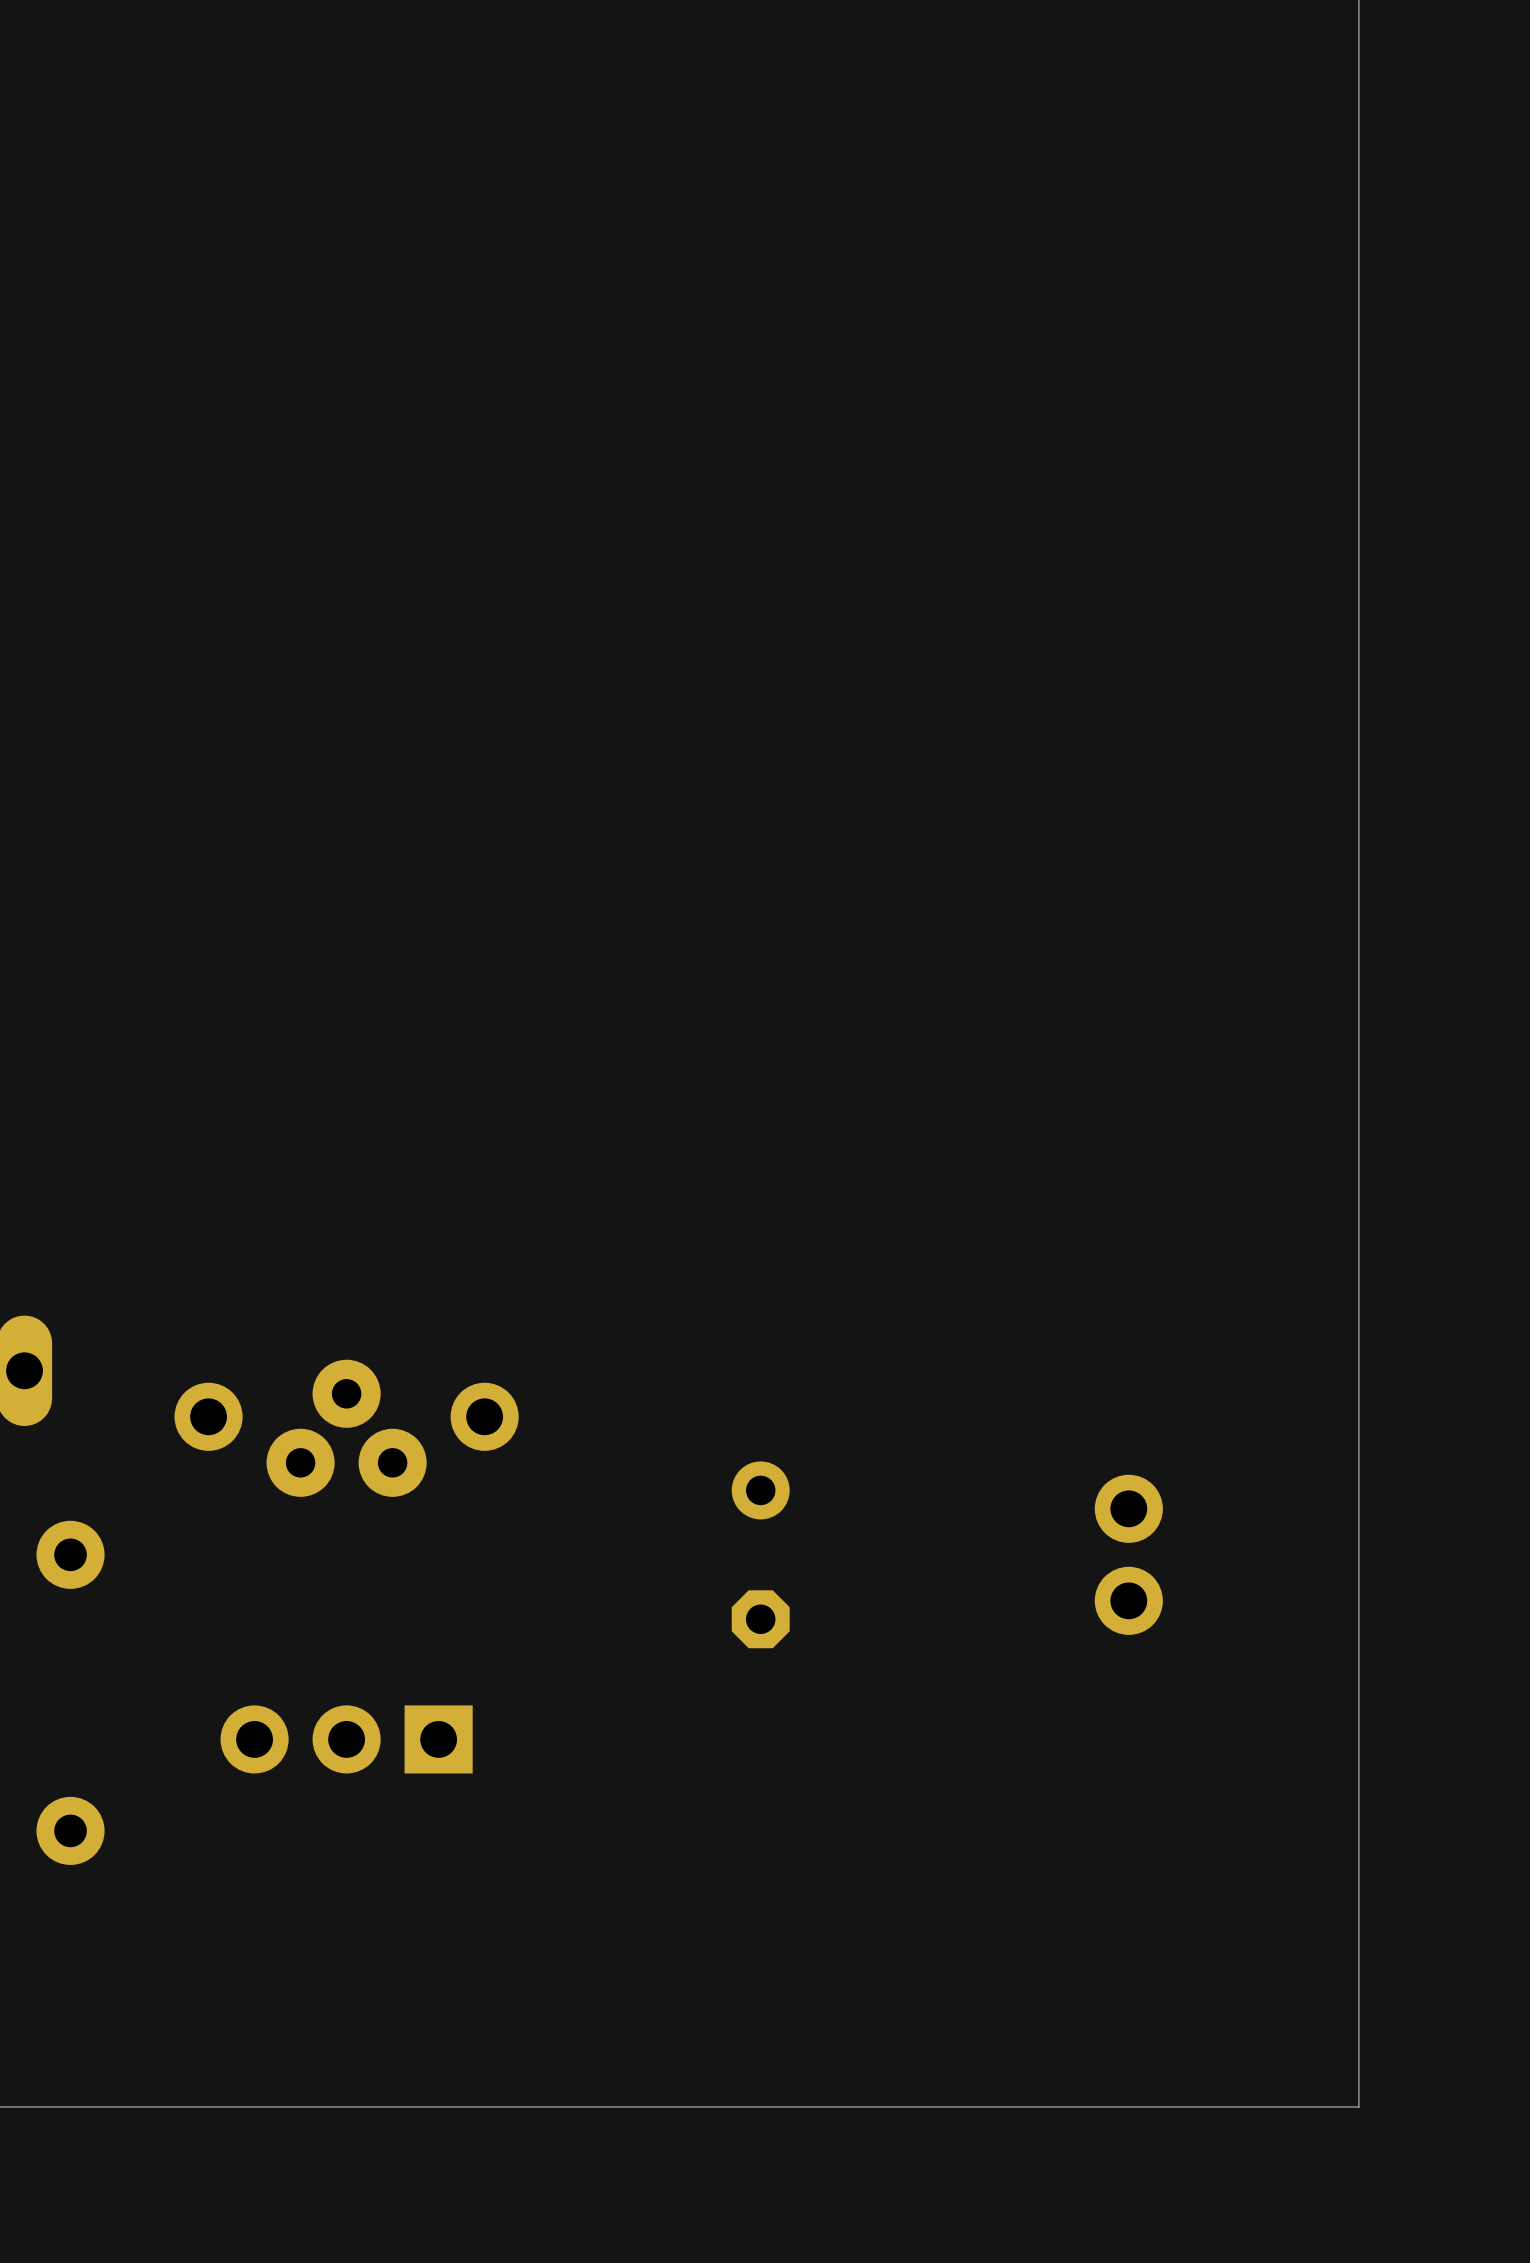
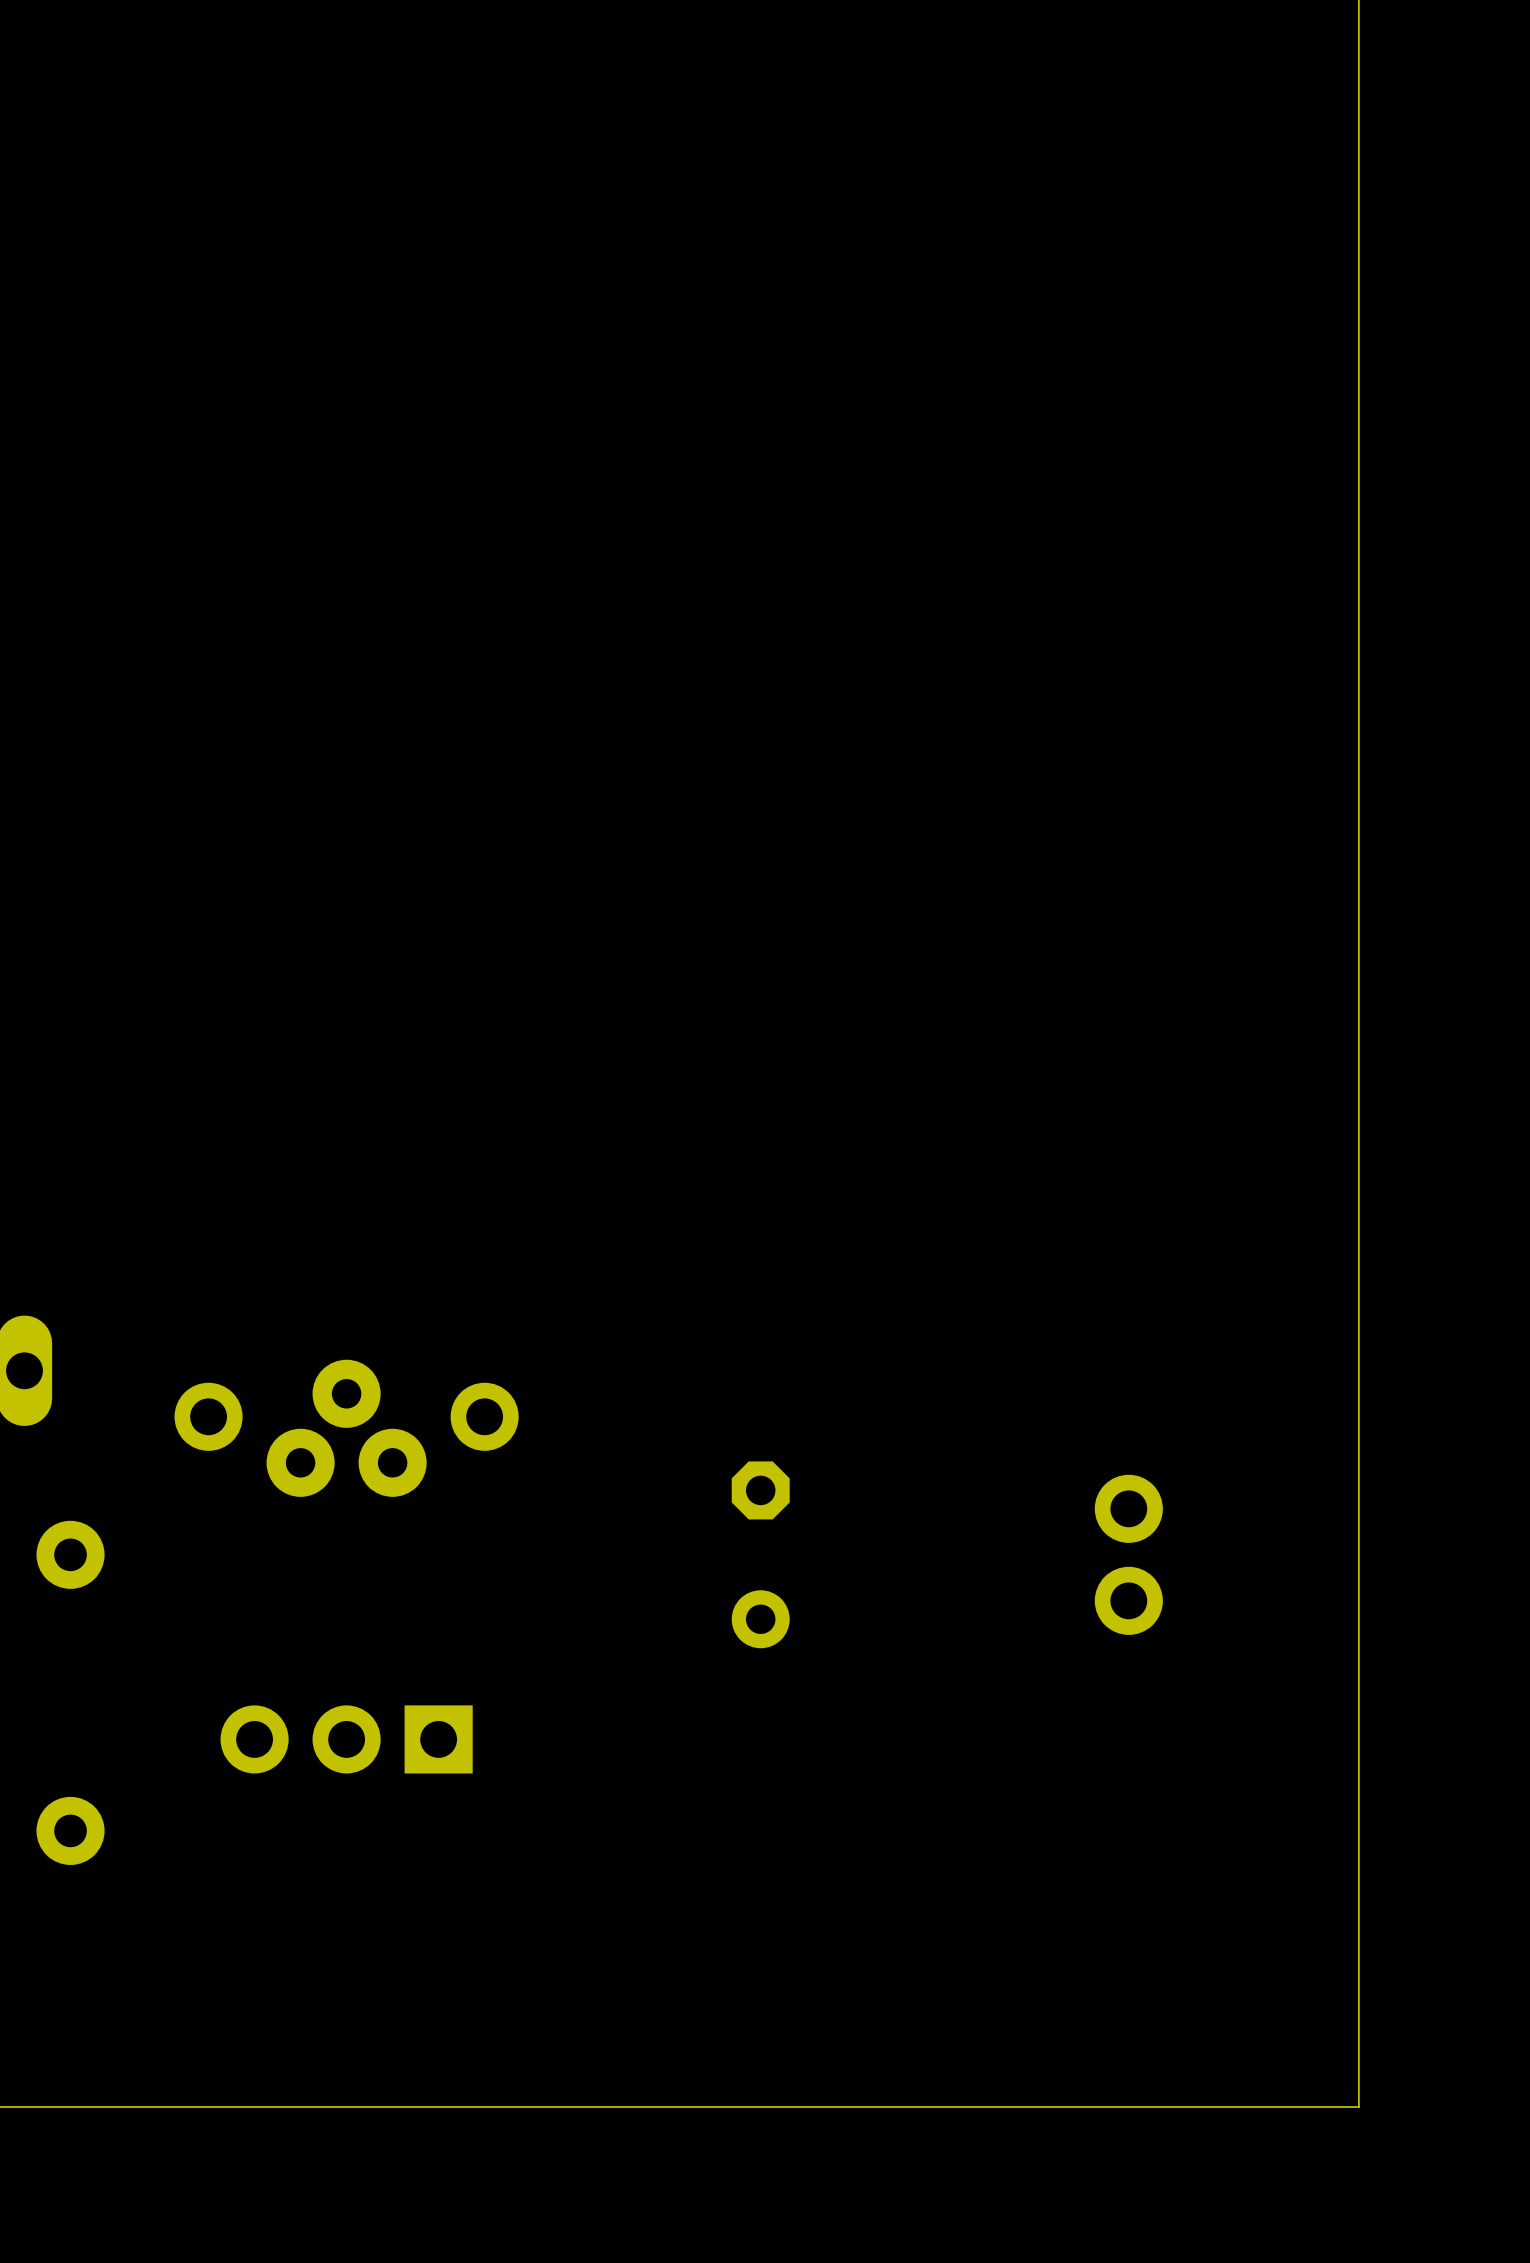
part rotation: 0° (760, 1554) -> 180° (760, 1554)

